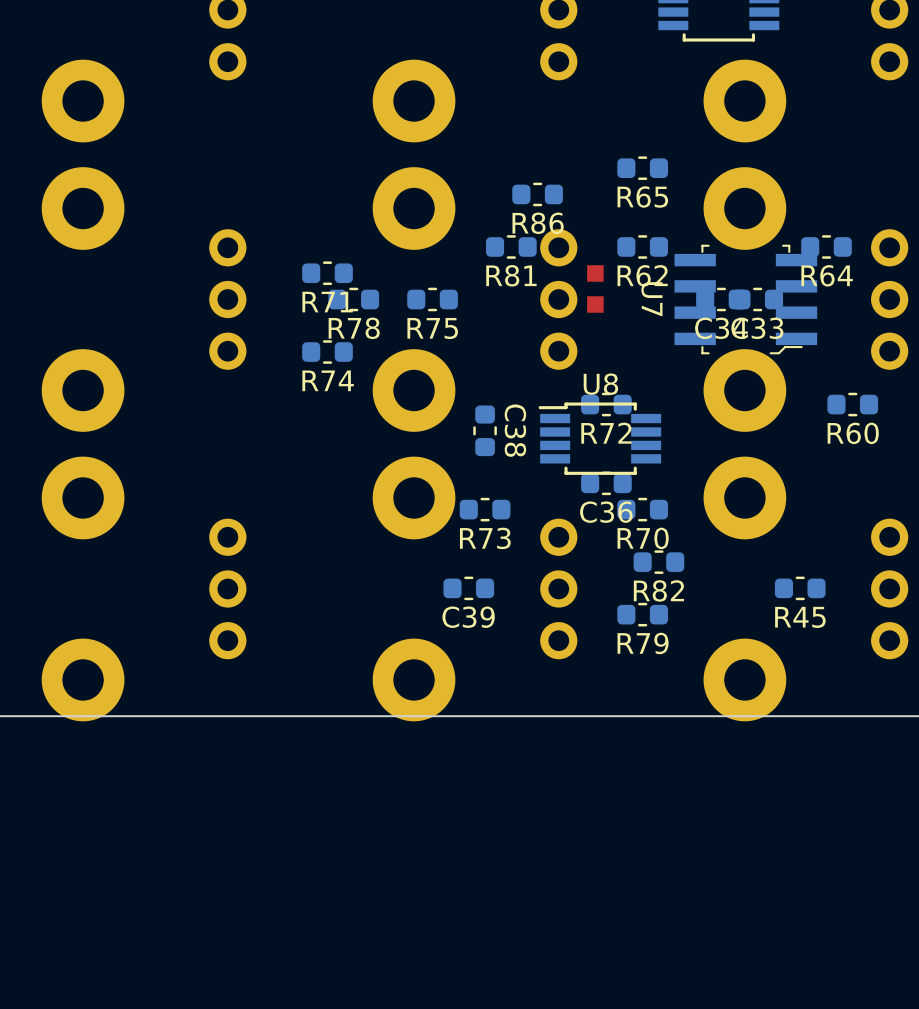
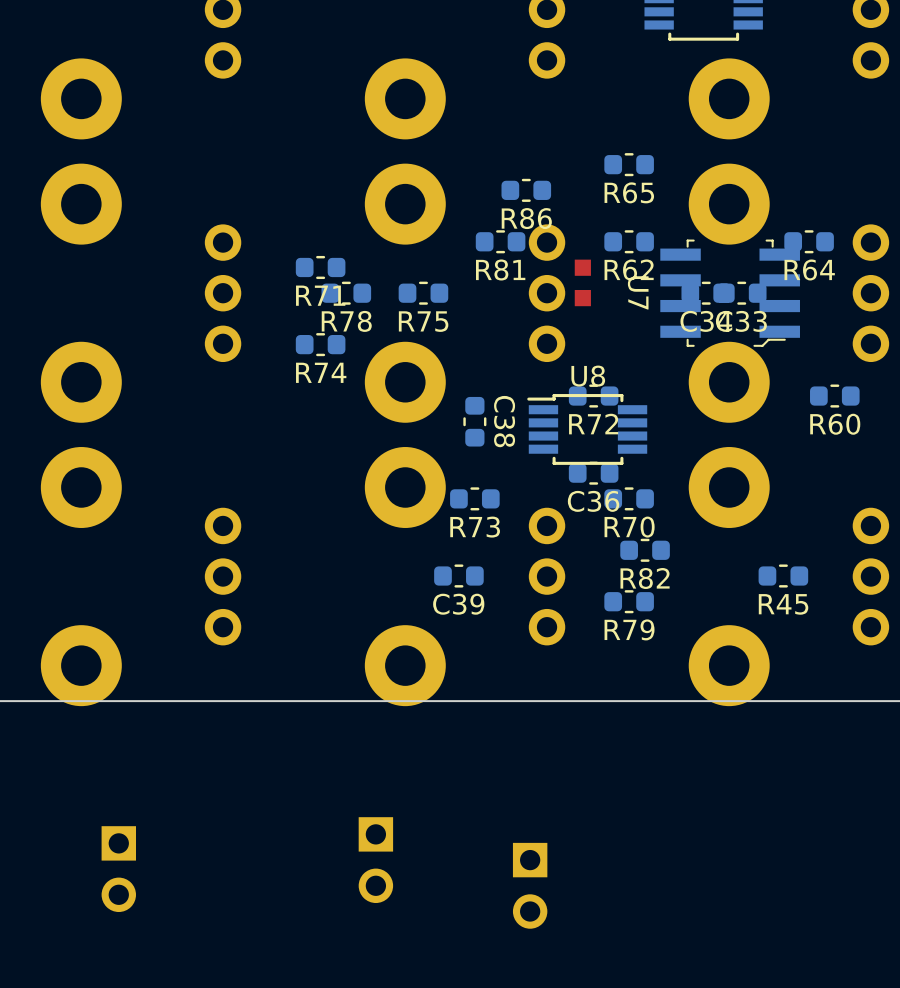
part: none -> (375, 860)
part: none -> (118, 869)
part: none -> (530, 885)

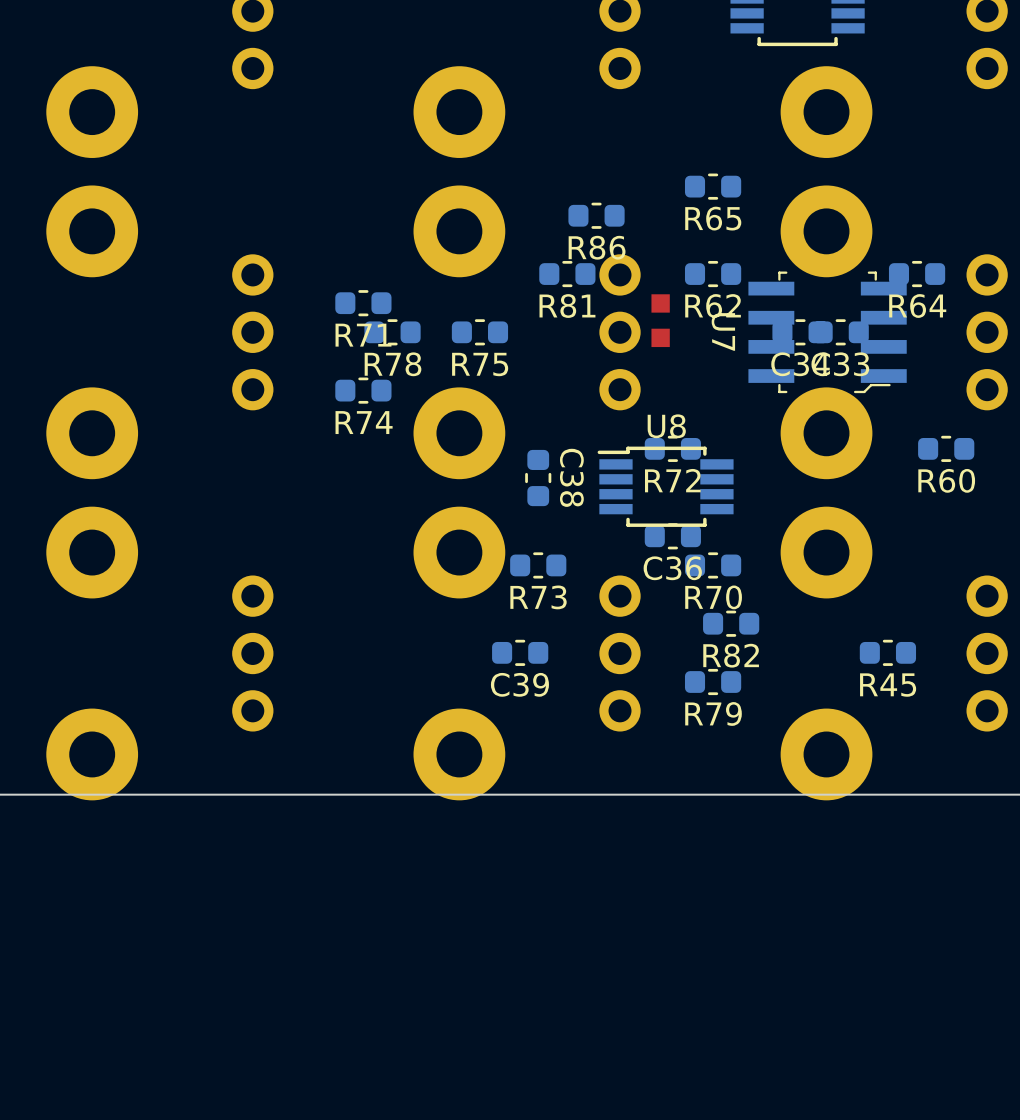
part: (375, 860) -> none
part: (118, 869) -> none
part: (530, 885) -> none

